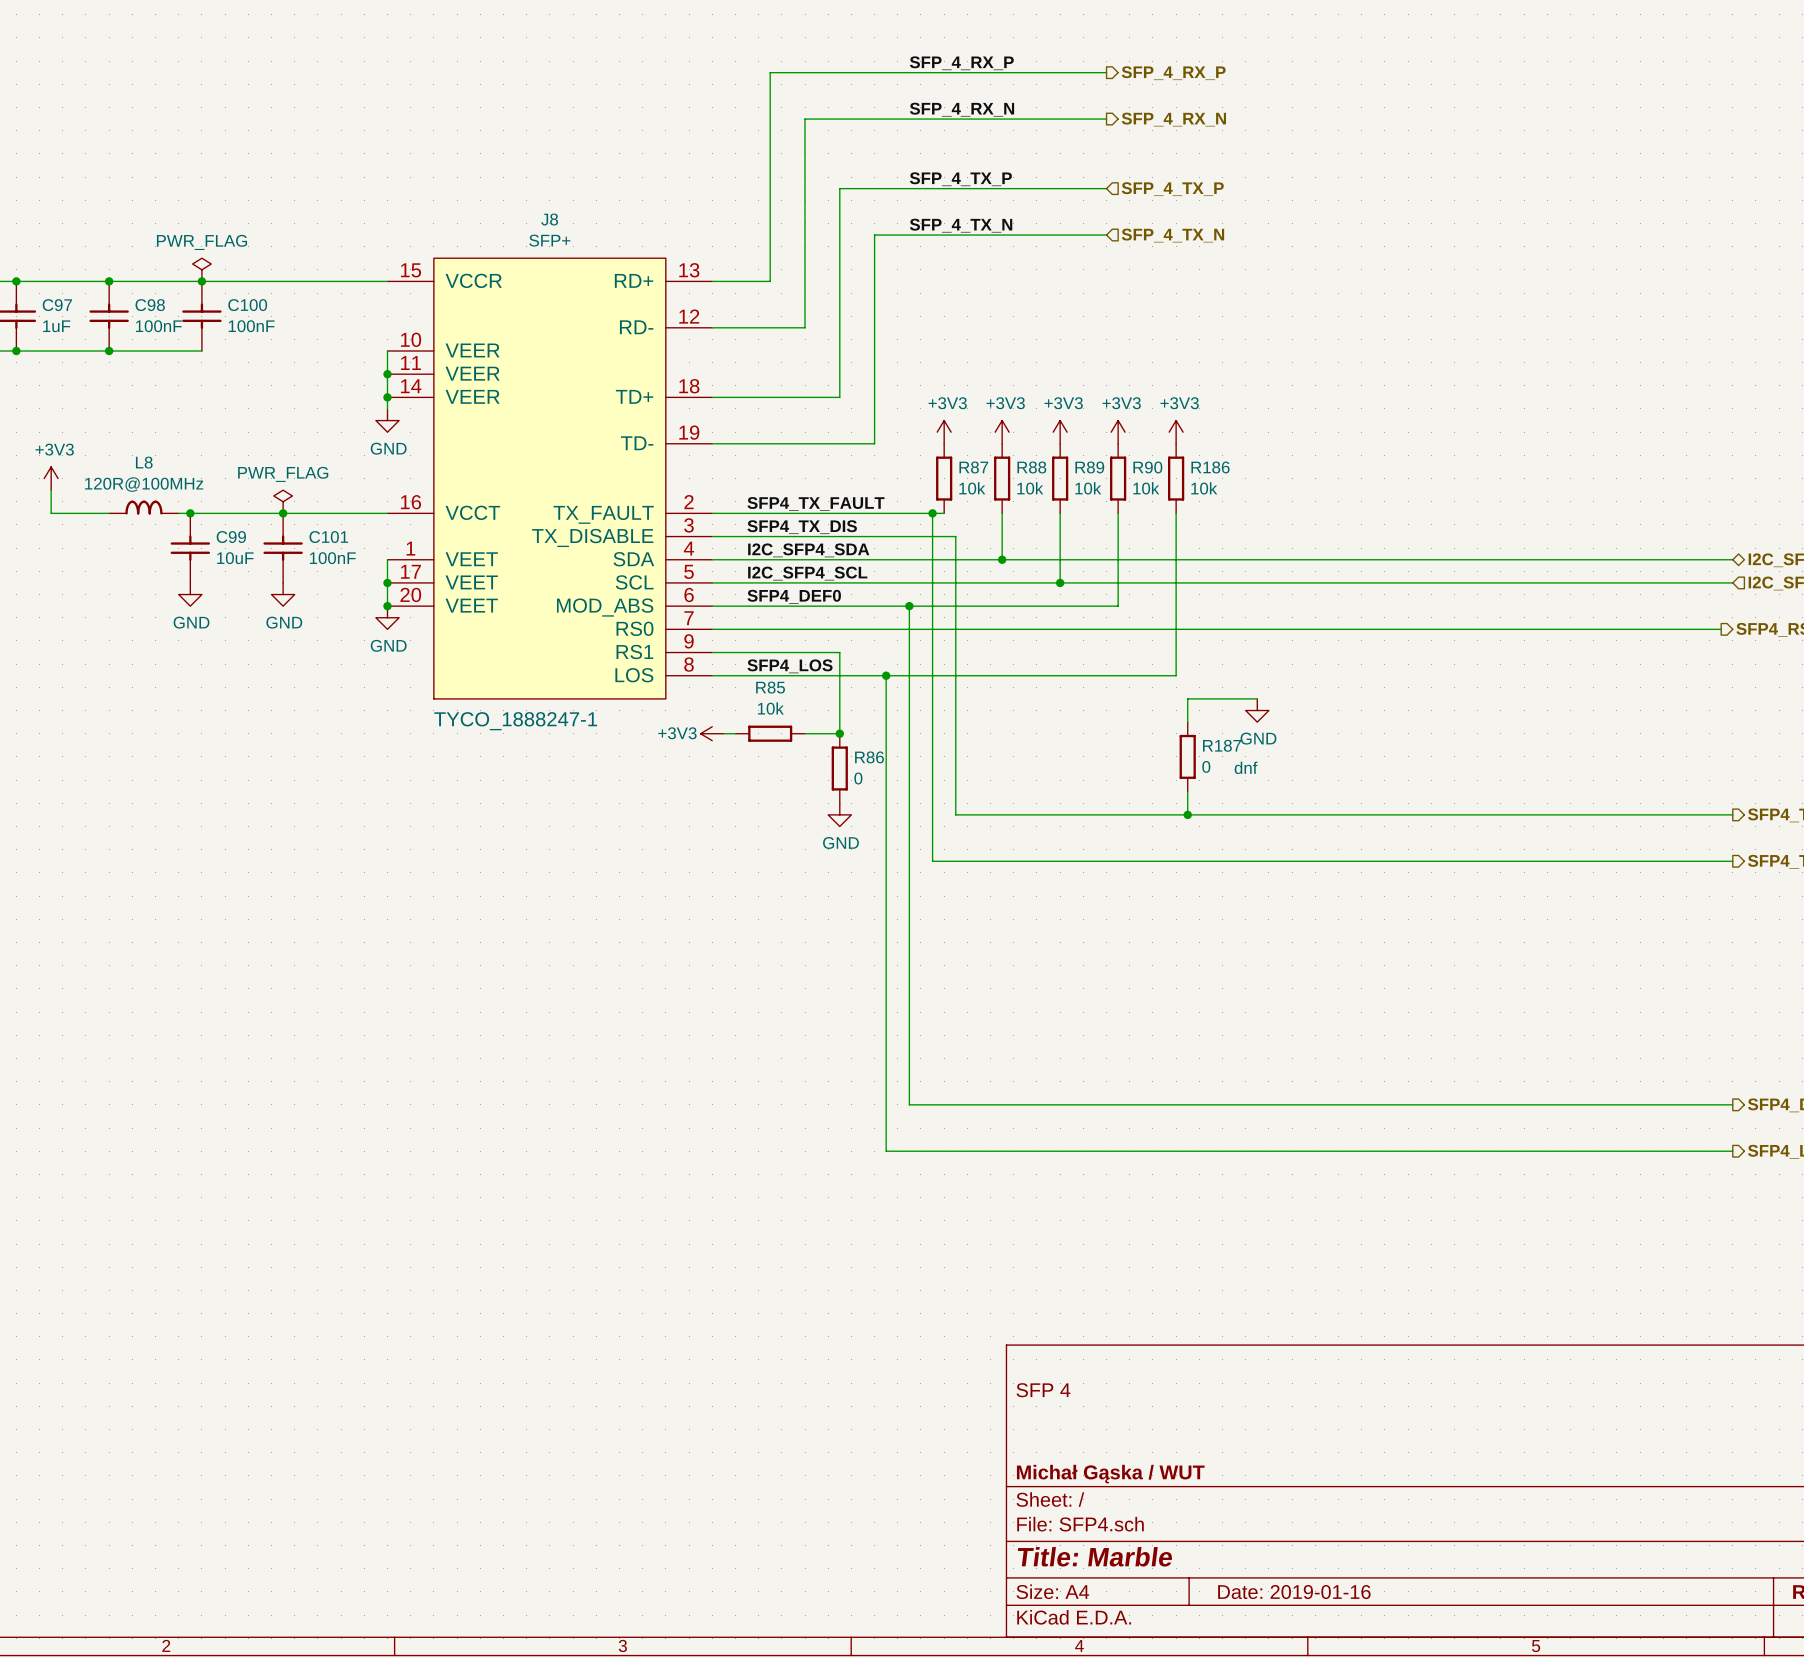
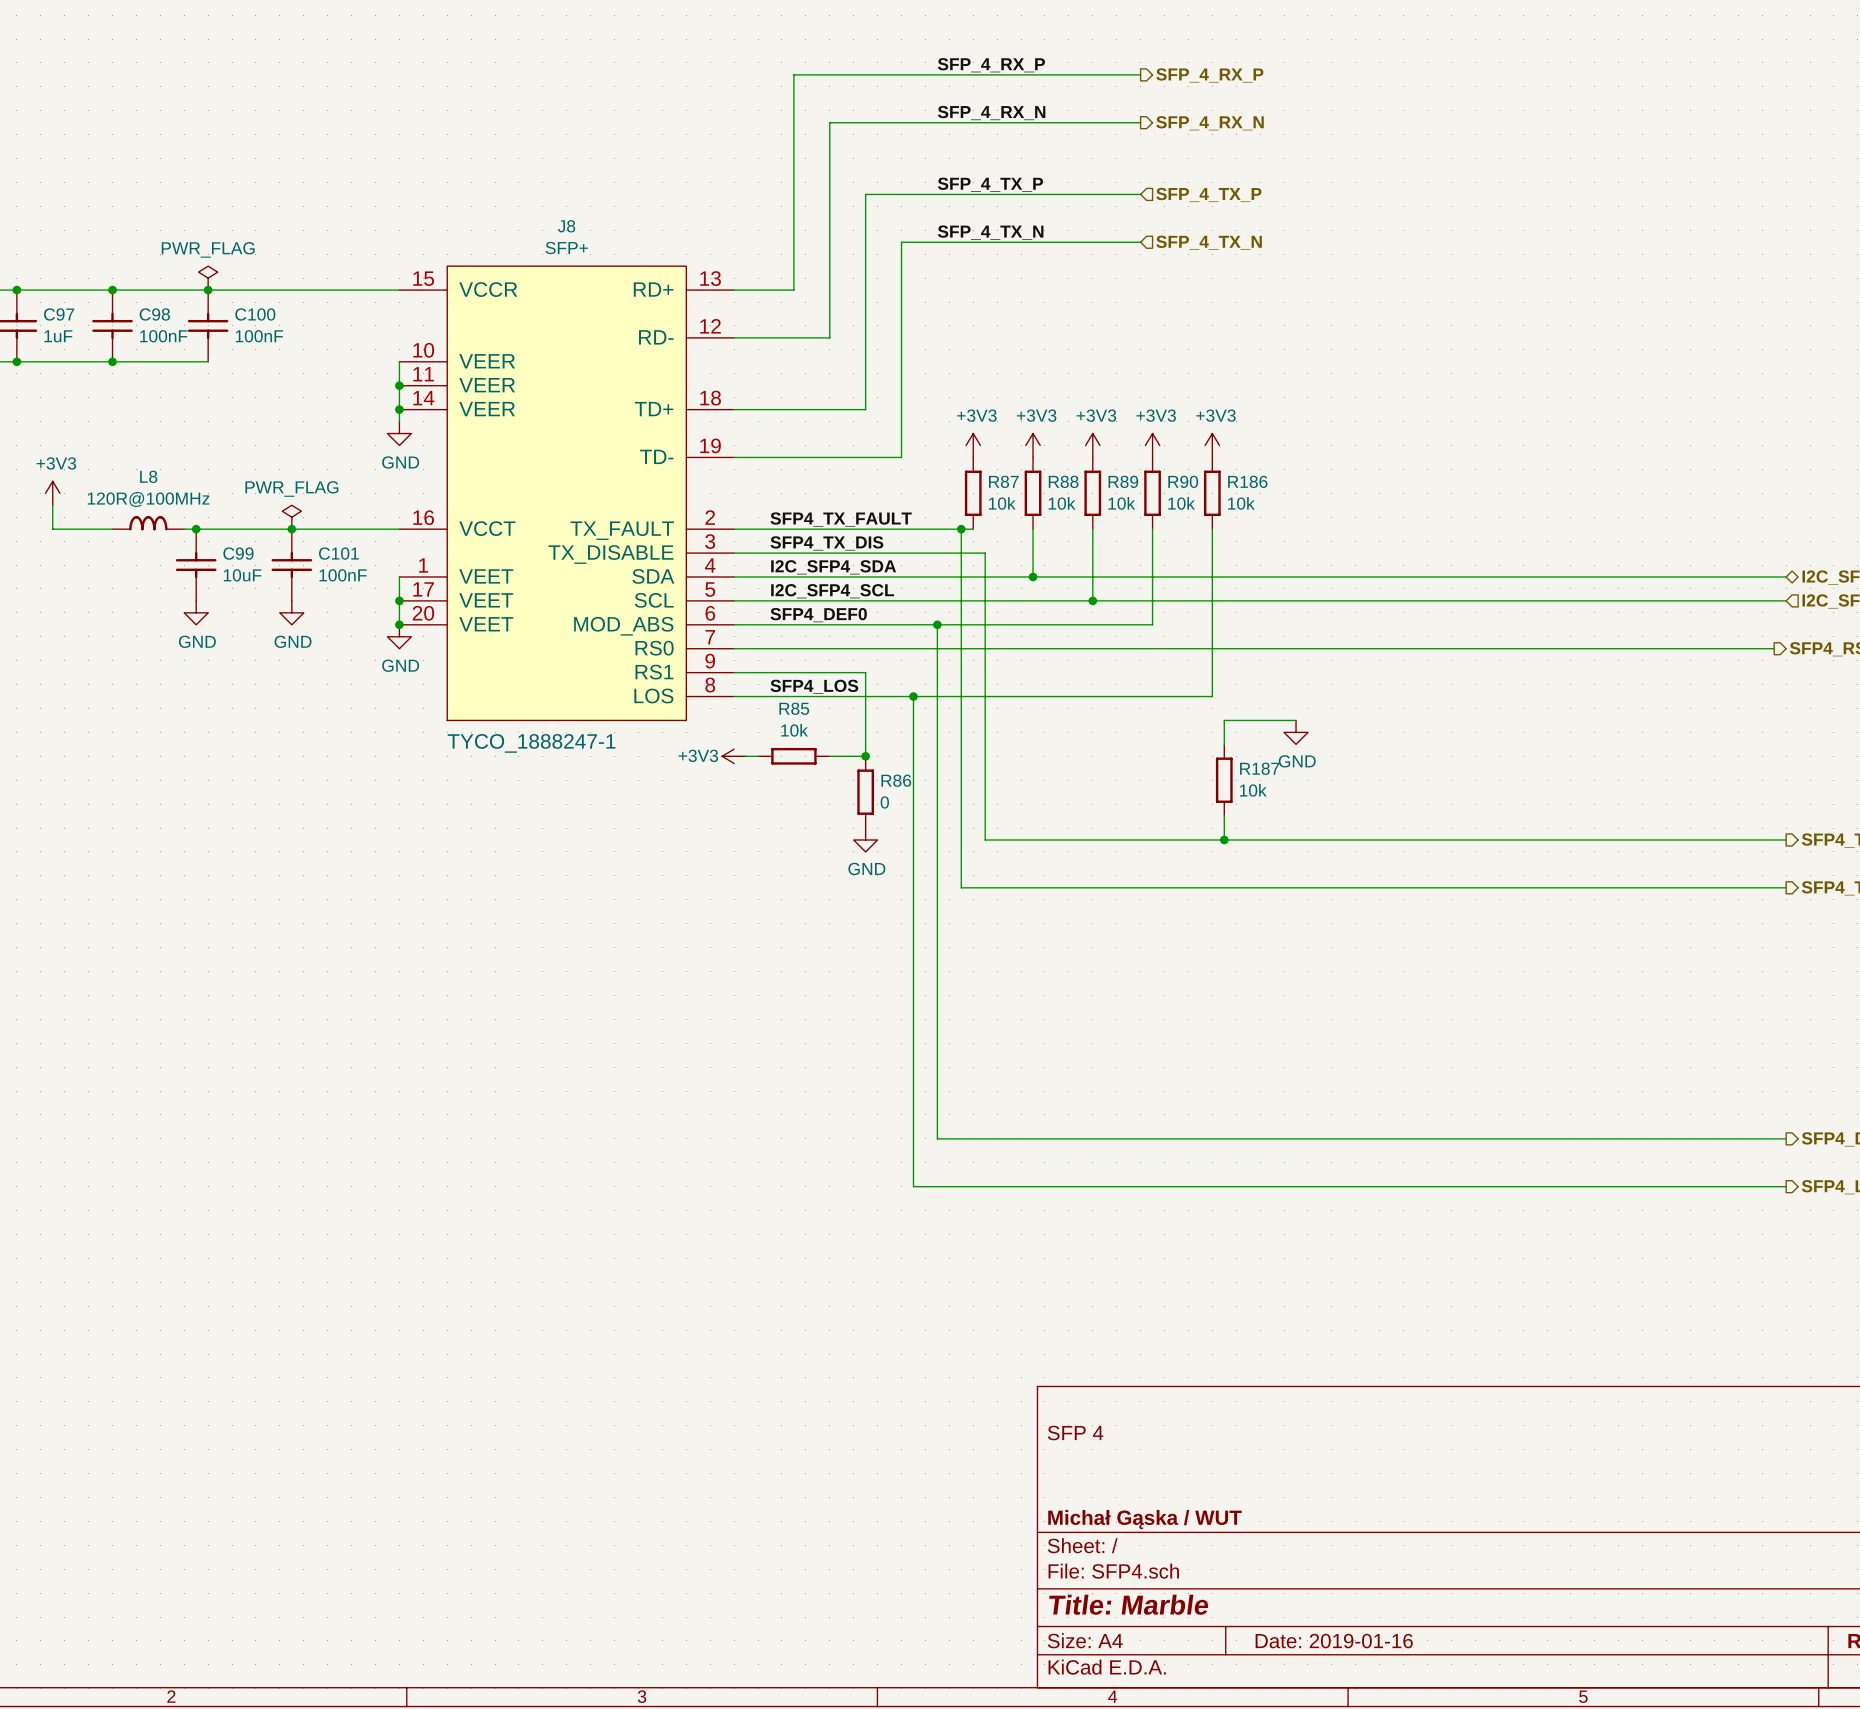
R187 text: 0 (1206, 766) -> 10k (1253, 790)
R187 text: dnf (1246, 767) -> none

